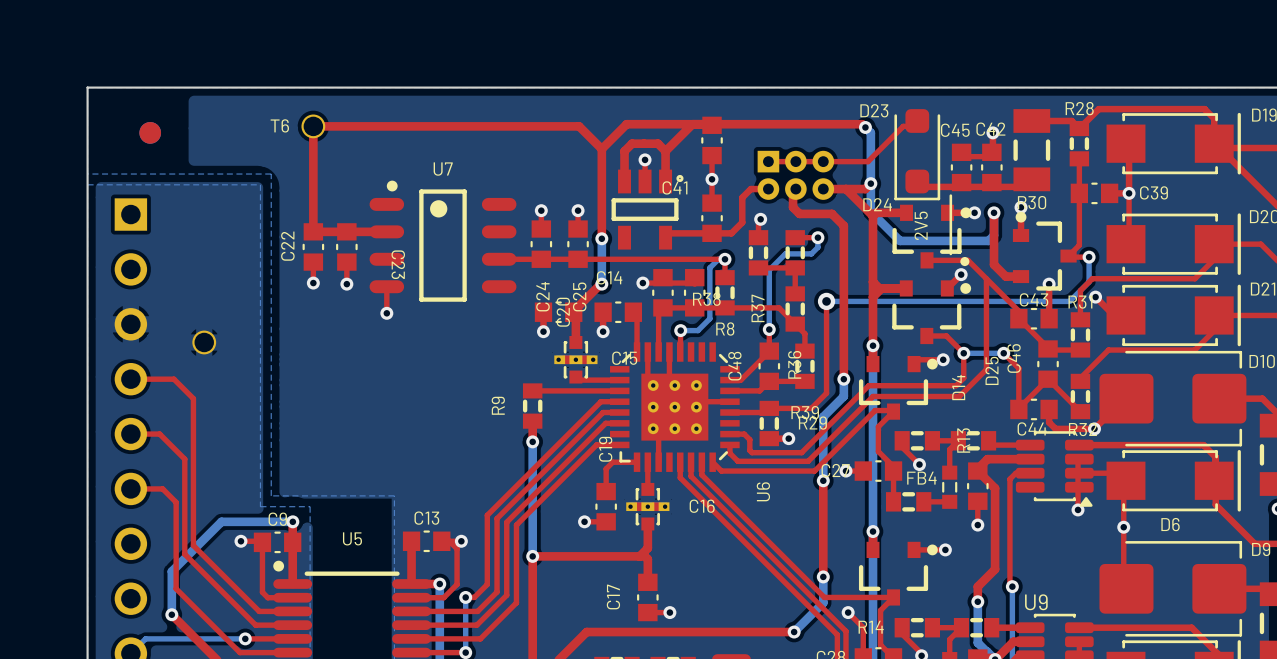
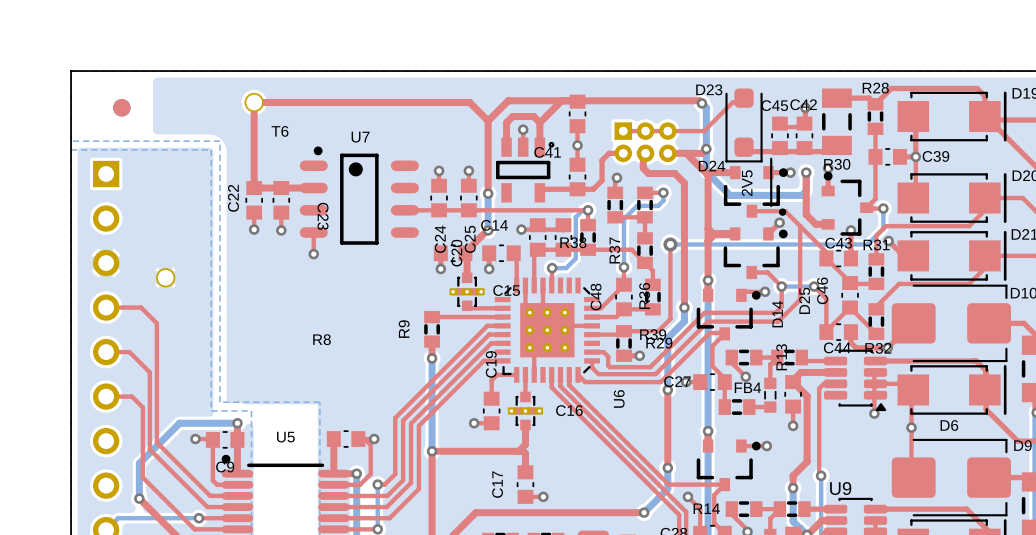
T6 name position: T6 (279, 125) -> T6 (280, 131)
R8 name position: R8 (725, 329) -> R8 (322, 339)
C13 name: C13 (426, 518) -> none
C9 name position: C9 (277, 519) -> C9 (225, 467)

